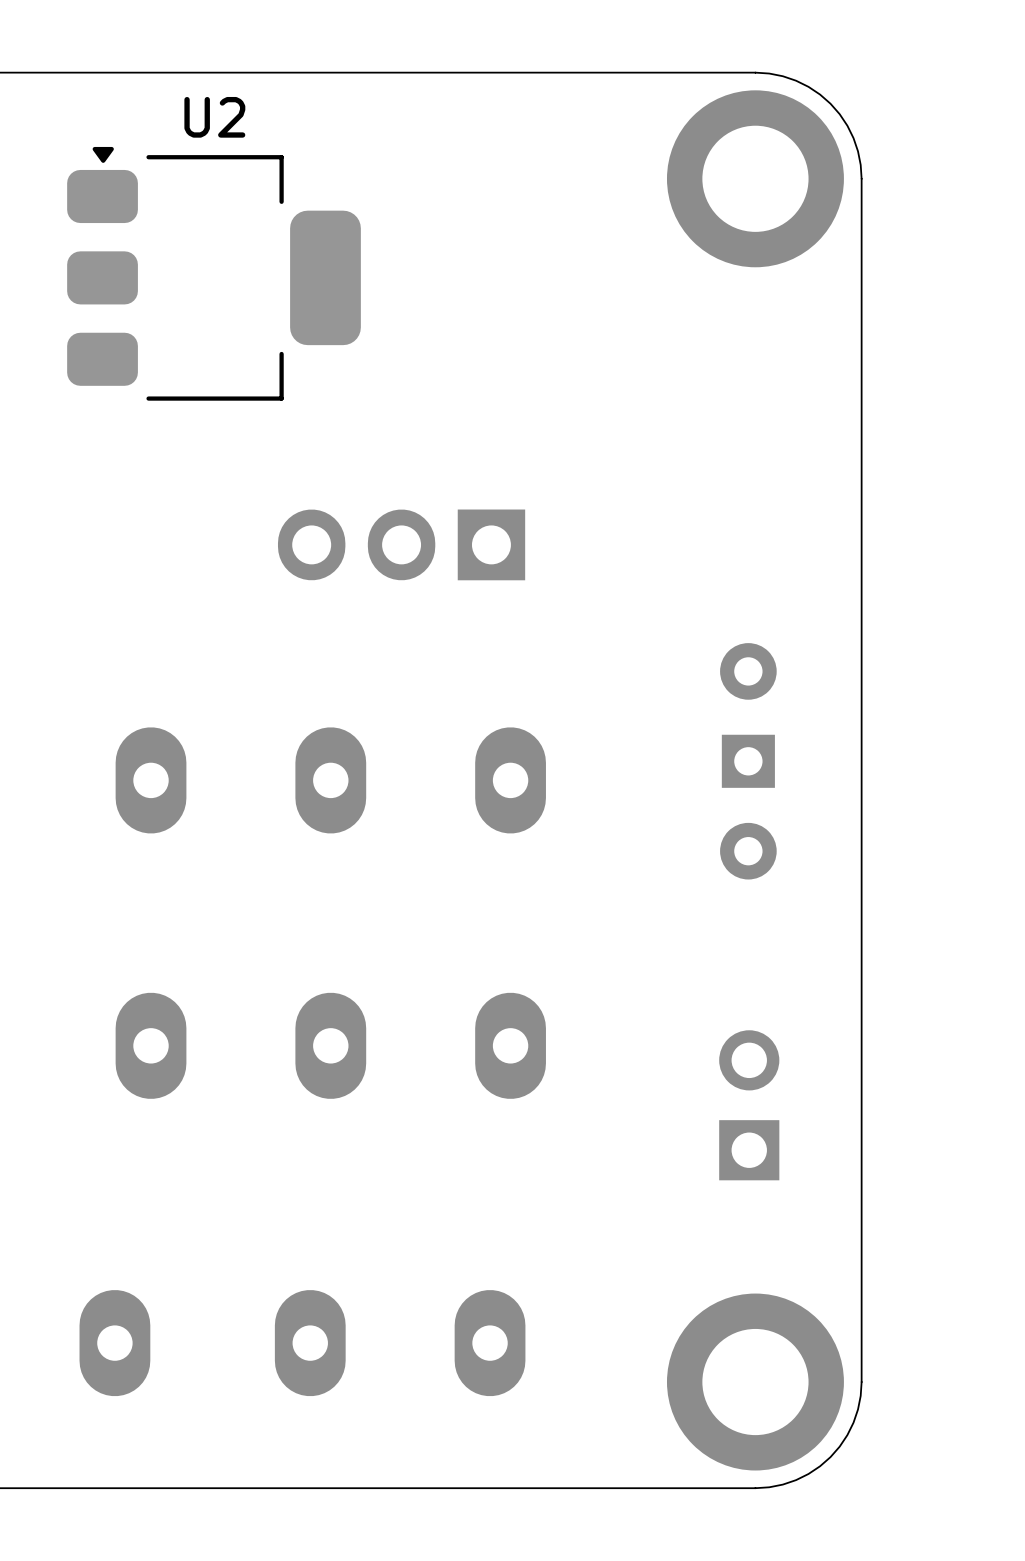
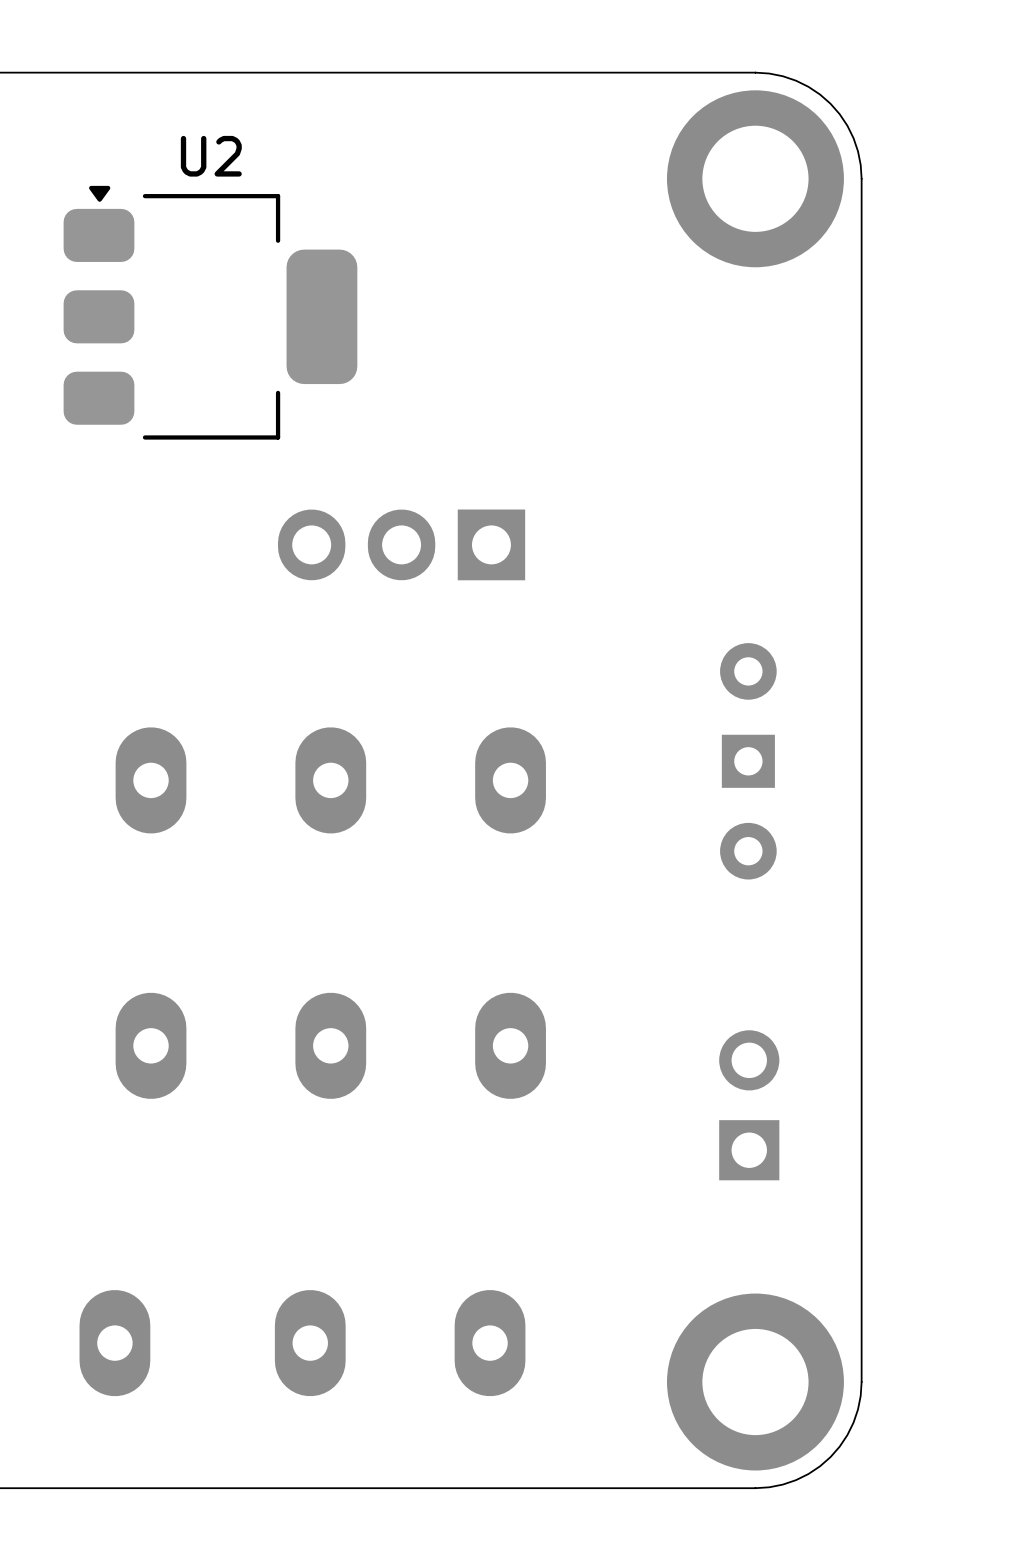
U2 position: (214, 273) -> (210, 312)

